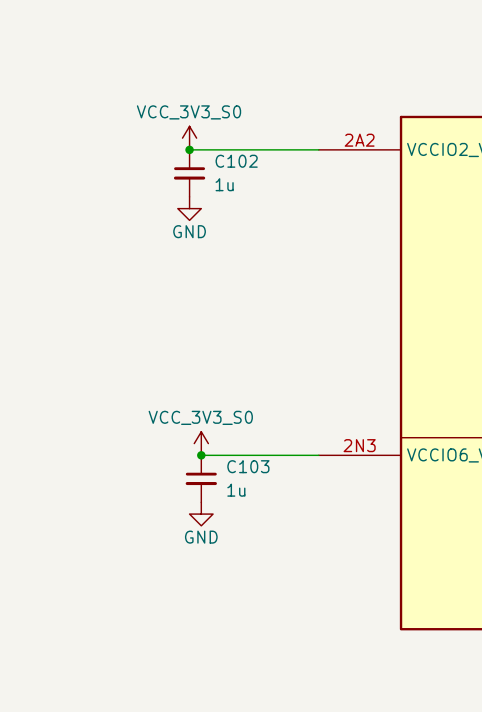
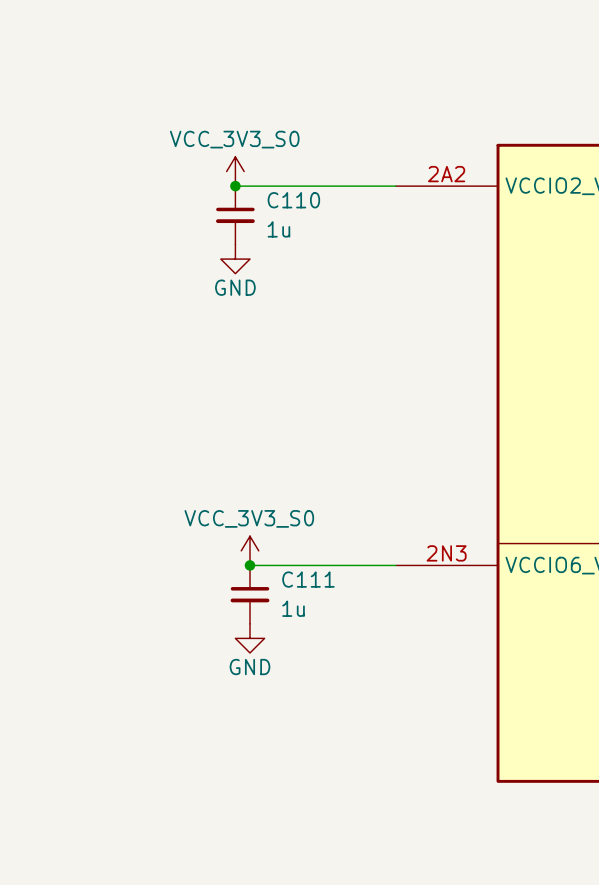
C102 name: C102 (236, 161) -> C110 (293, 200)
C103 name: C103 (248, 466) -> C111 (308, 579)

